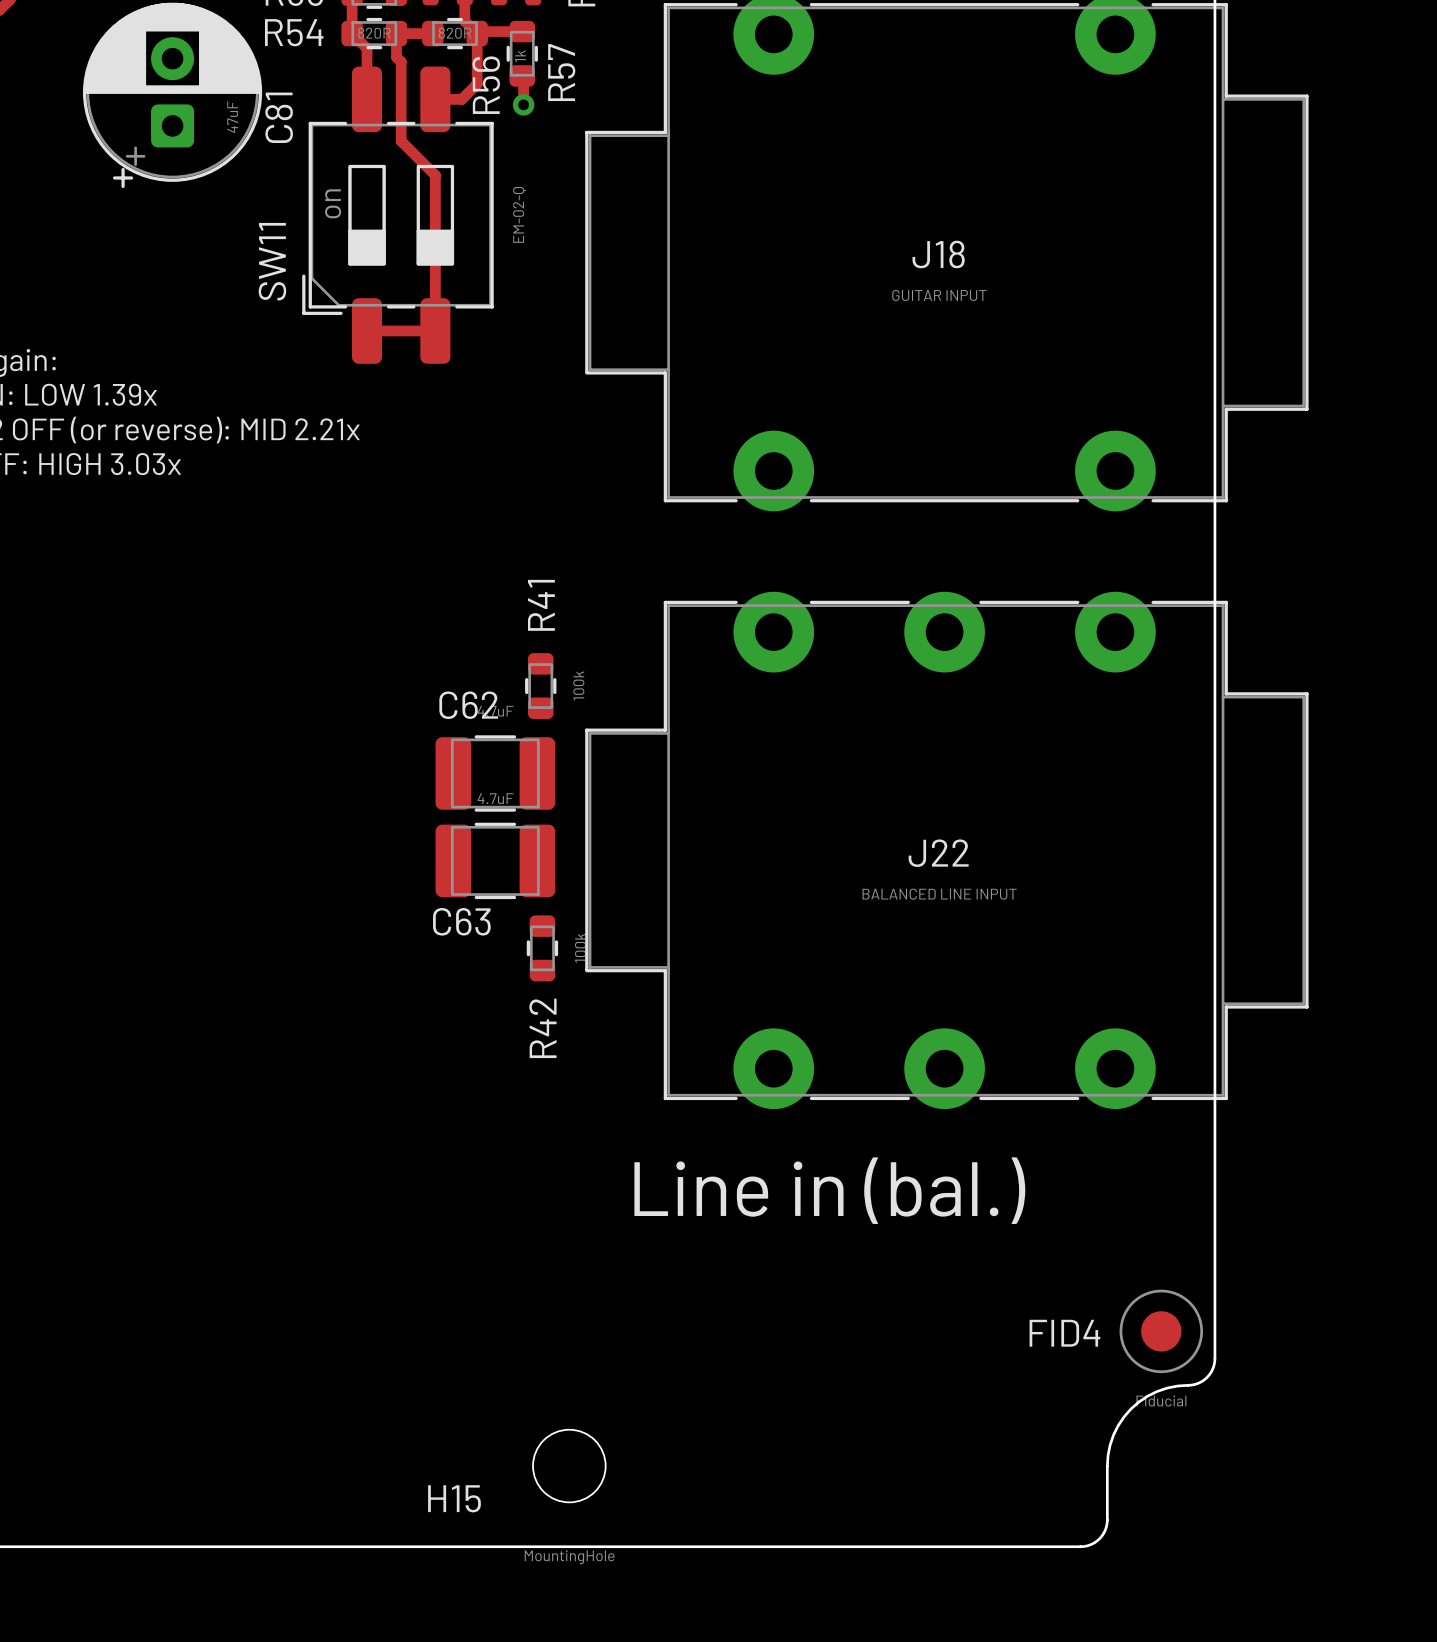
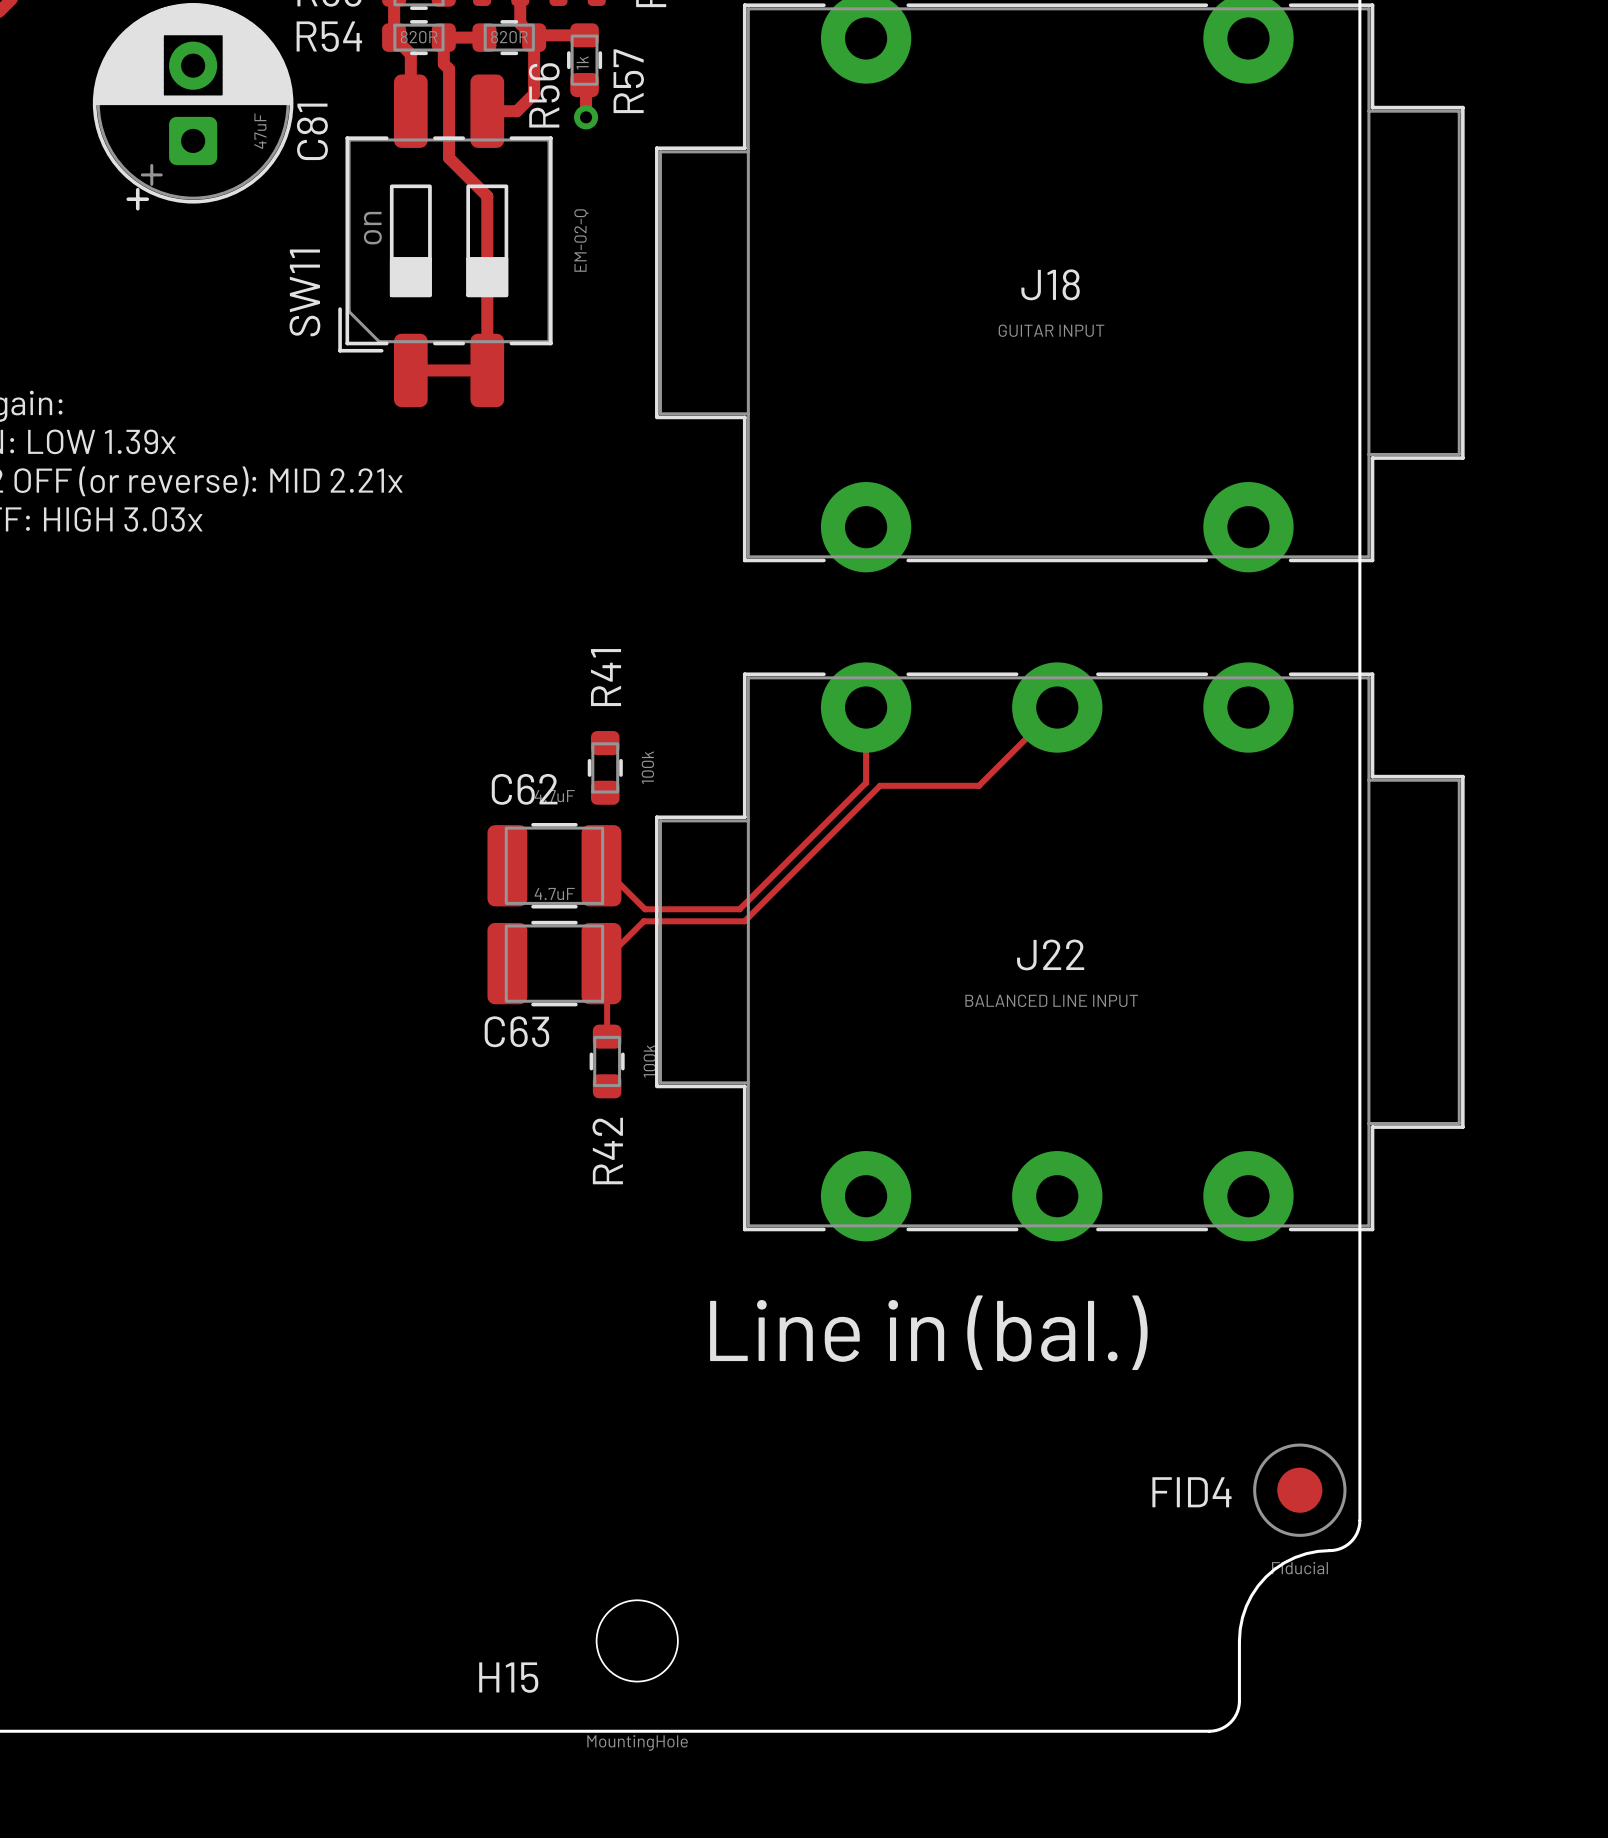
track: none -> (866, 707) (866, 782) (739, 909) (645, 909) (601, 865) (601, 882)
track: none -> (1057, 707) (978, 785) (880, 785) (744, 921) (643, 921) (601, 963) (607, 969) (607, 1036)

